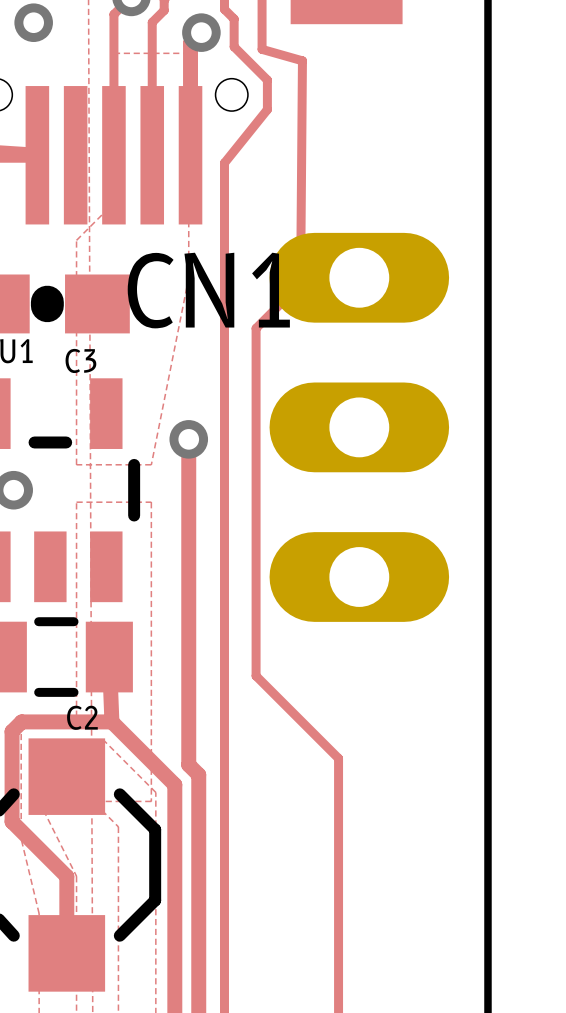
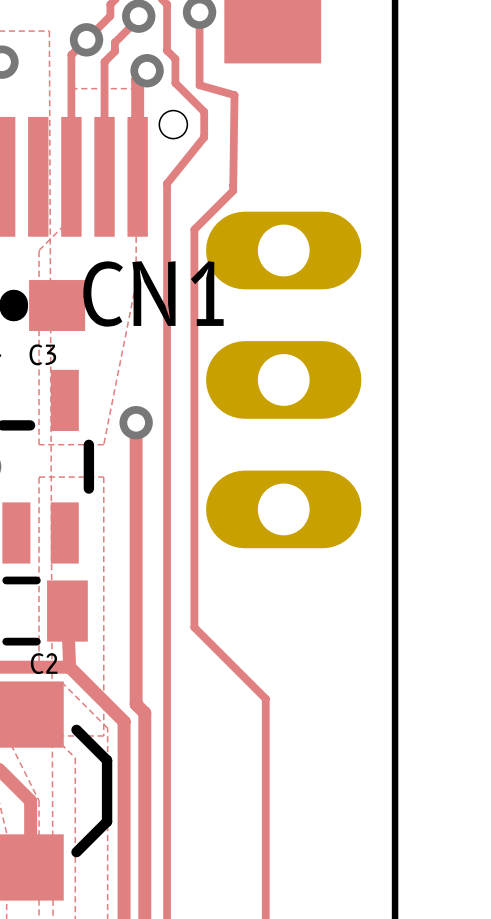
track: (302, 60) (300, 283) (256, 328) -> (234, 95) (233, 190) (194, 229) (194, 326)
part position: (359, 427) -> (283, 379)

